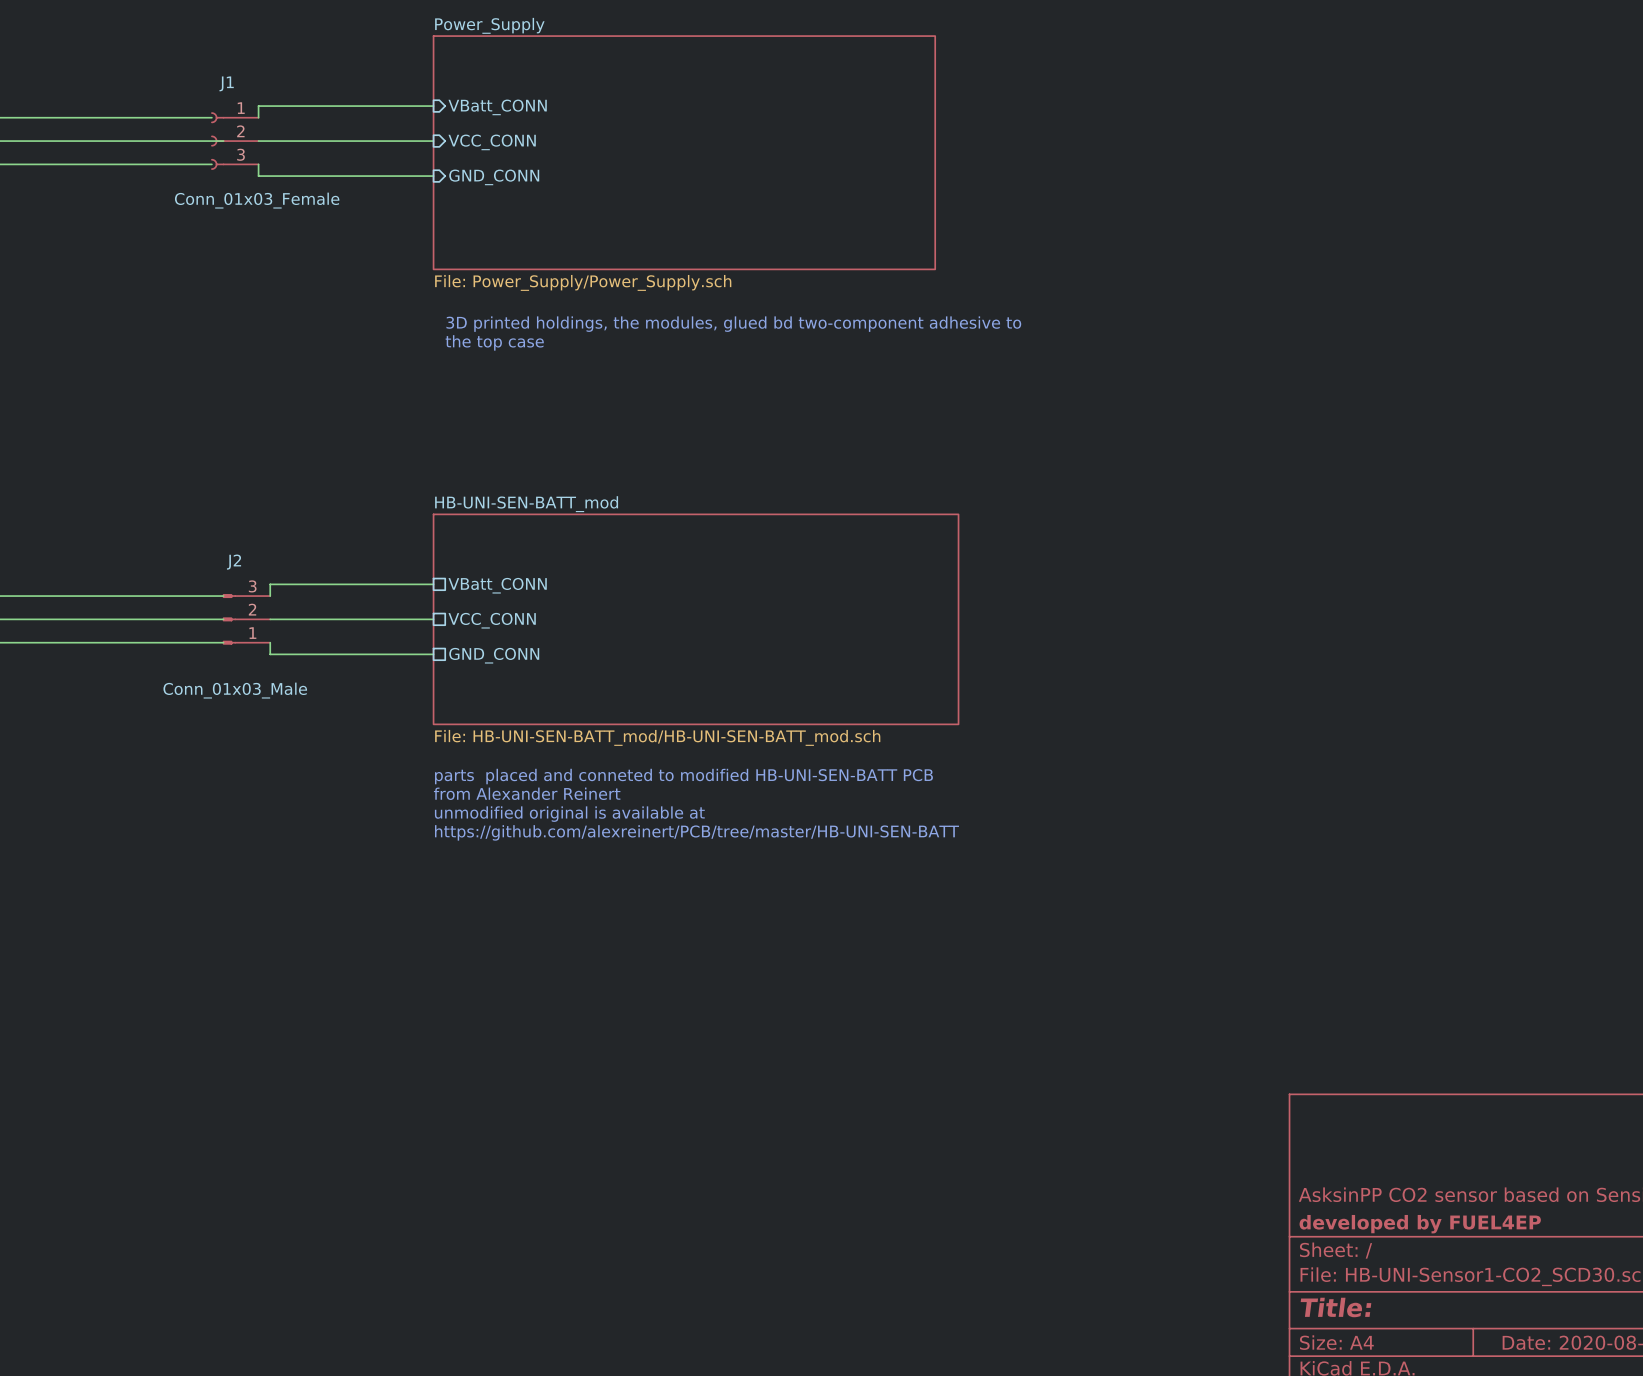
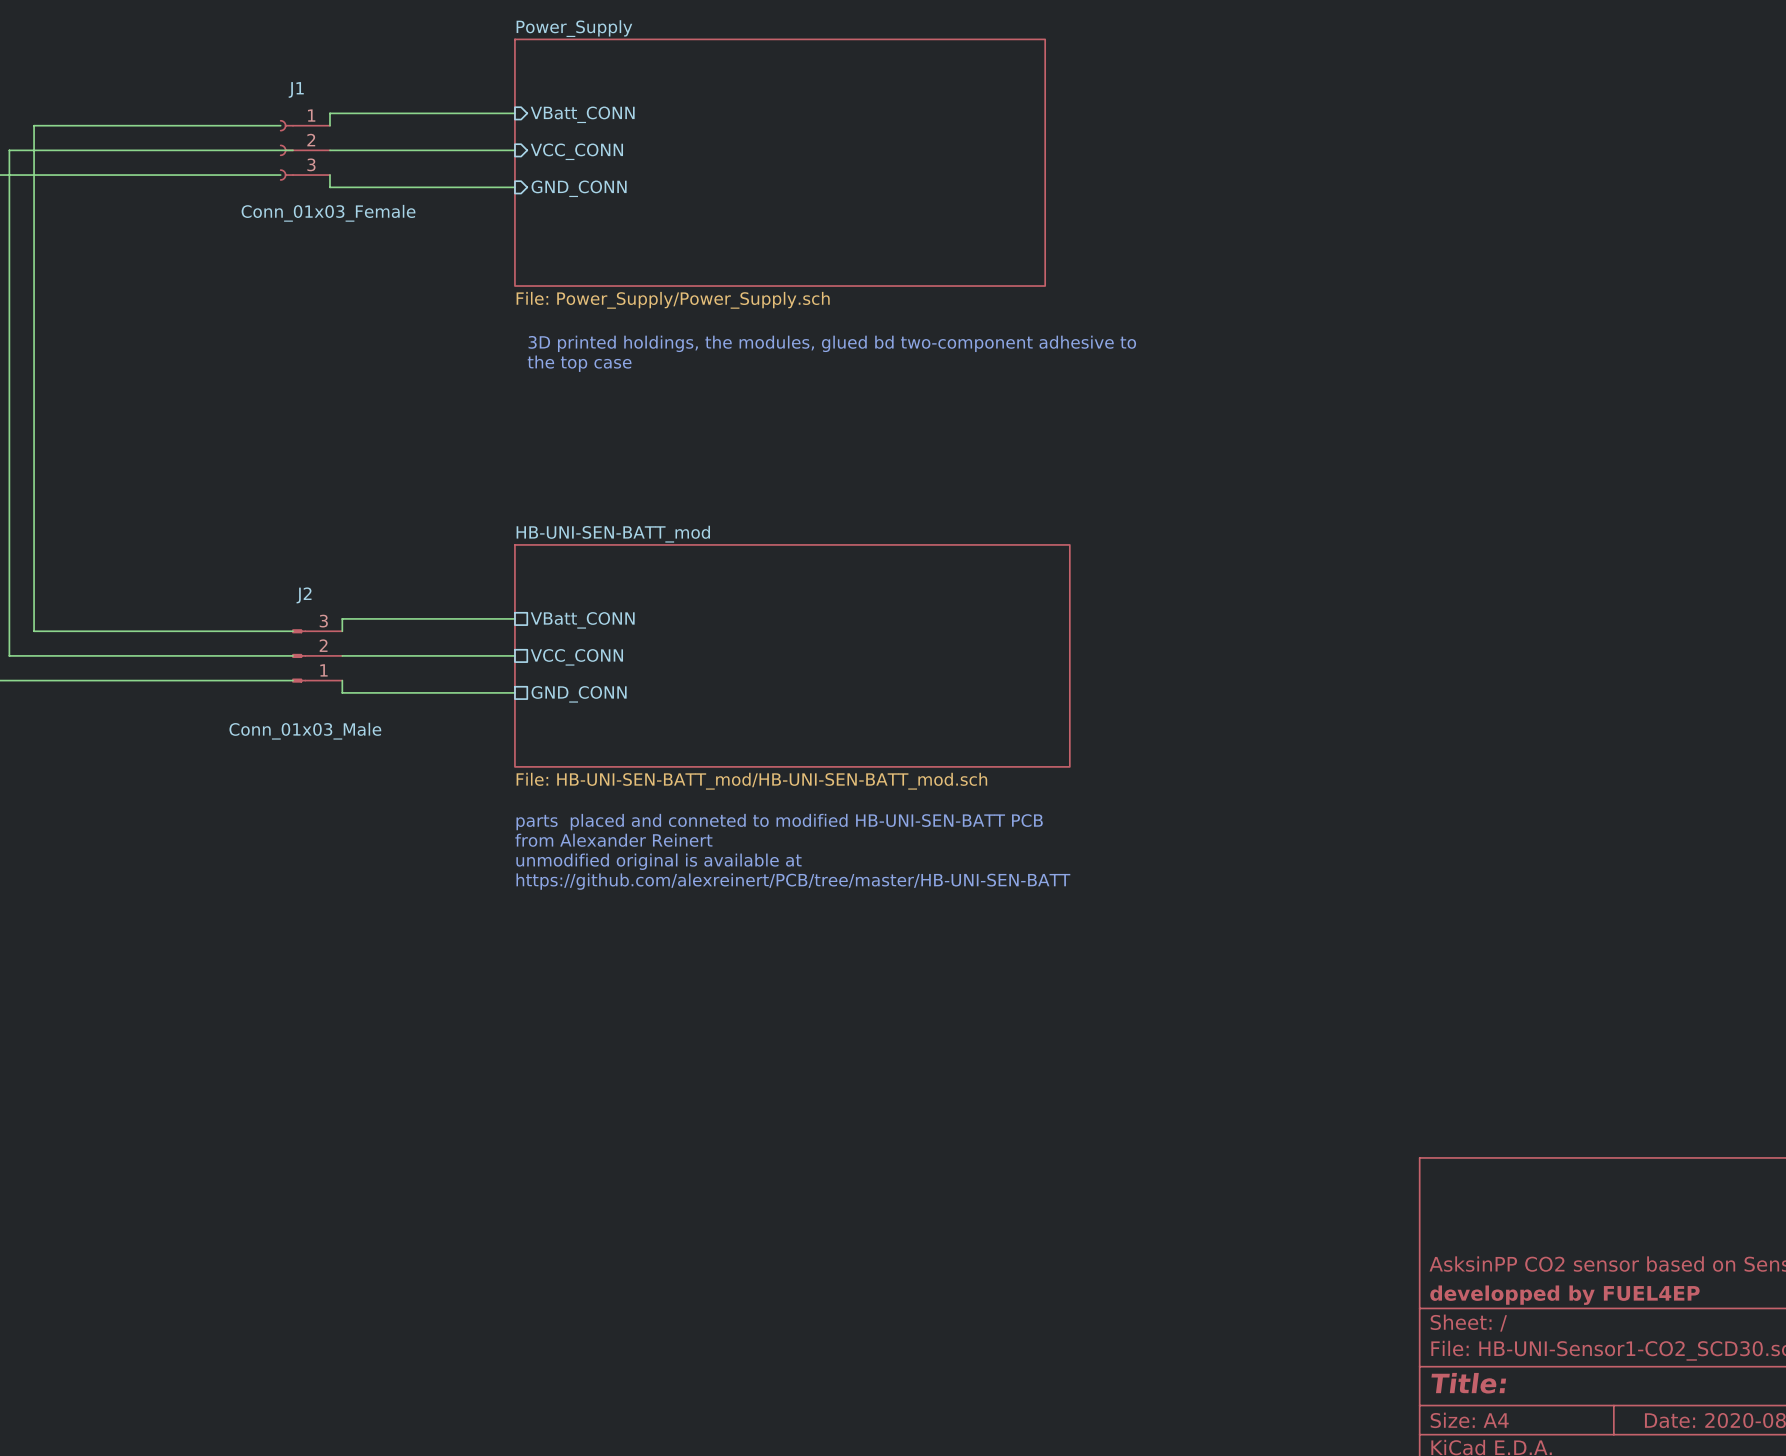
title block: developed by FUEL4EP (1420, 1224) -> developped by FUEL4EP (1564, 1295)

